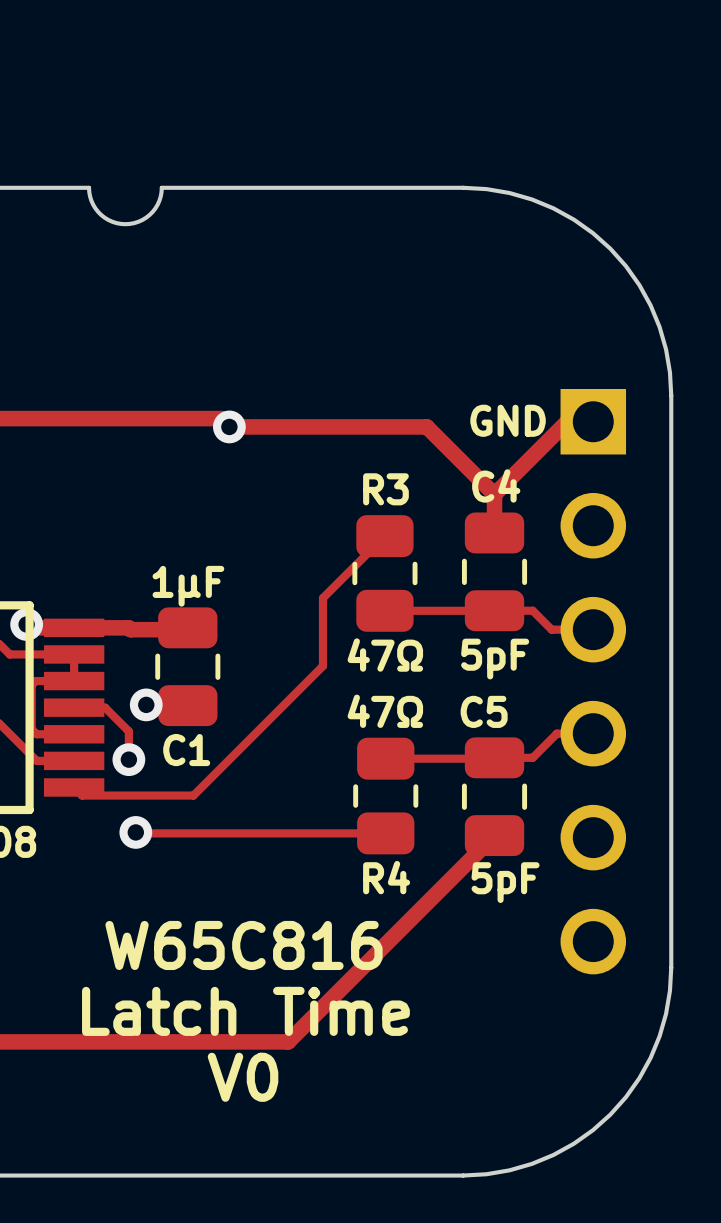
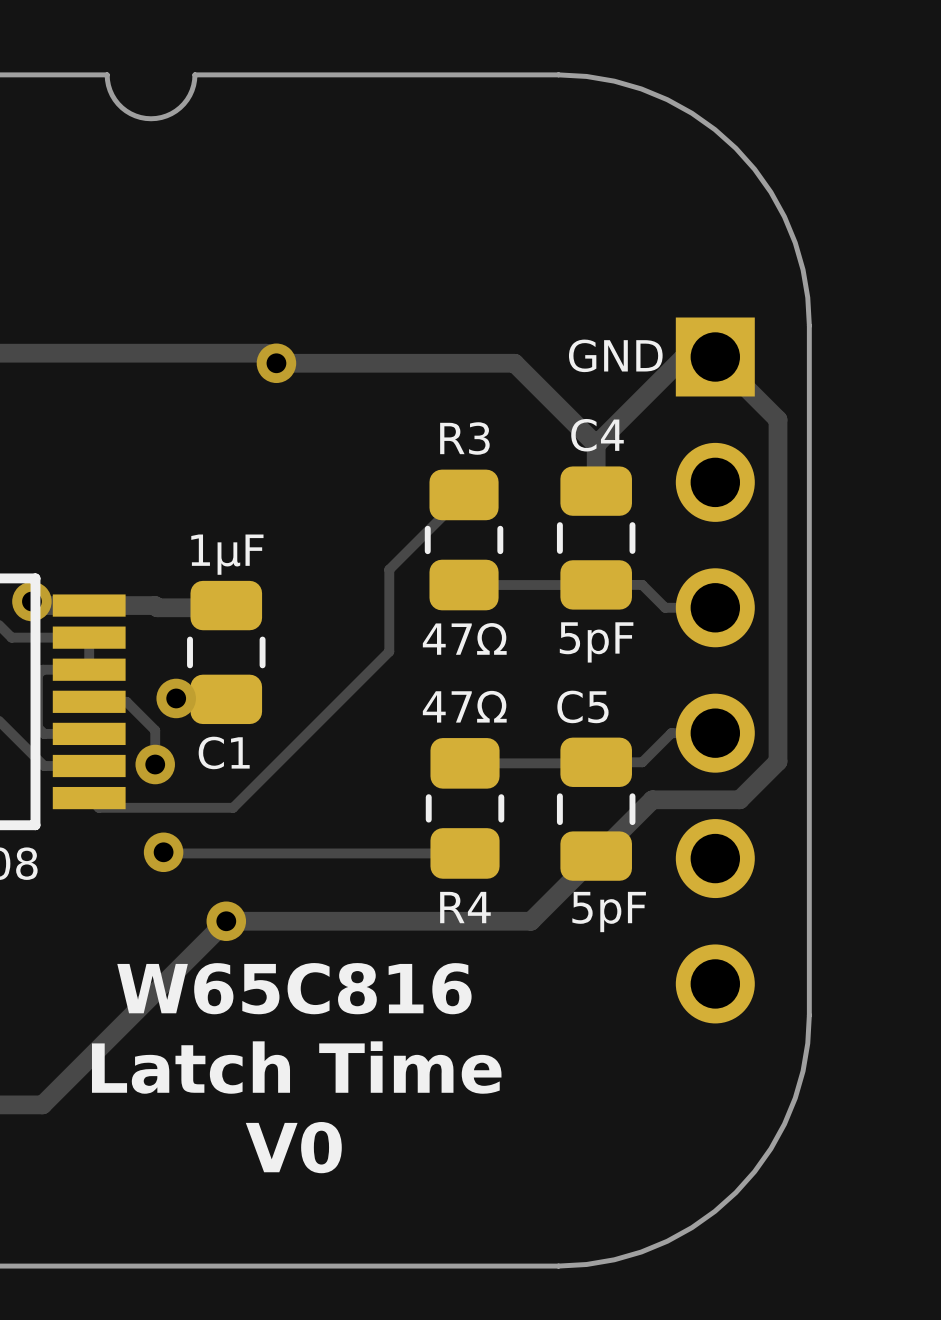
track: none -> (715, 357) (778, 419) (778, 761) (739, 799) (652, 799) (596, 856)
via: none -> (226, 921)
track: (440, 889) (288, 1041) (35, 1041) -> (531, 921) (226, 921) (42, 1104)

